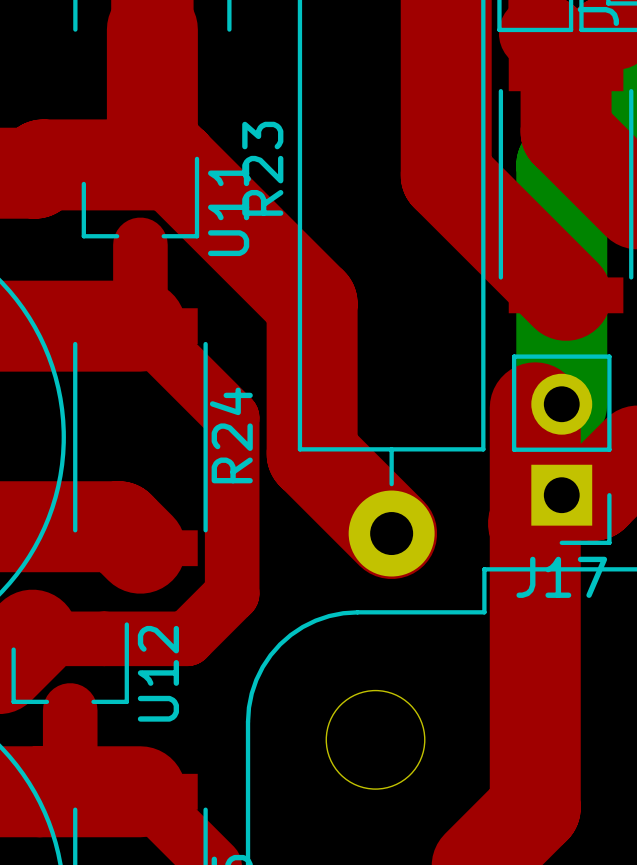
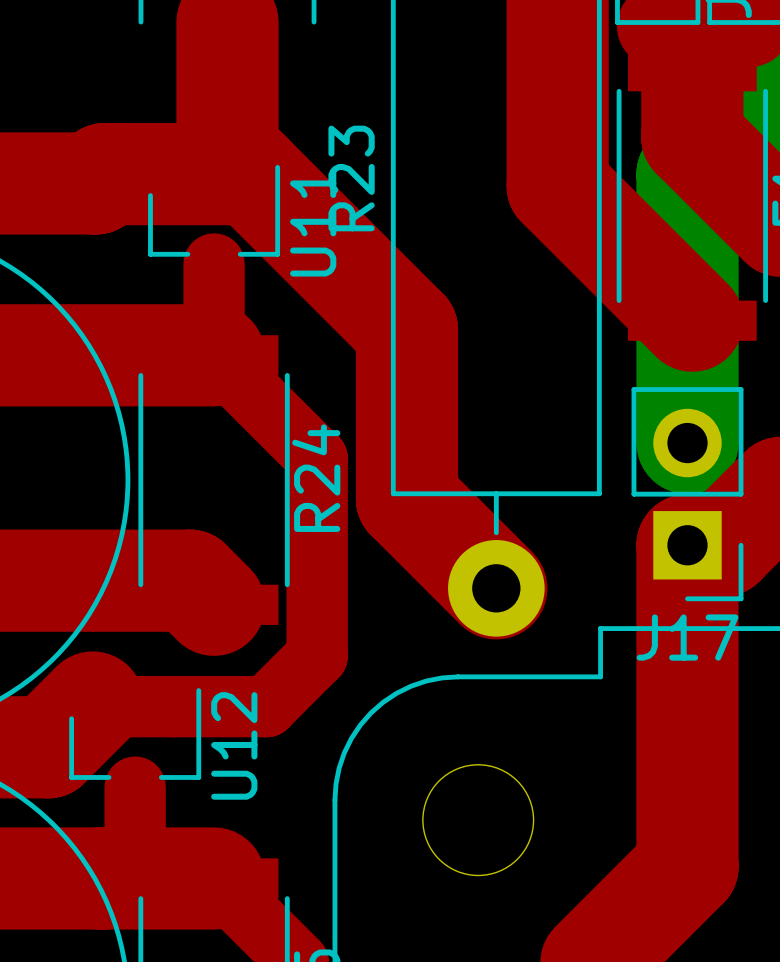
top track: (535, 407) (535, 807) -> (687, 545) (687, 866) (657, 896)

